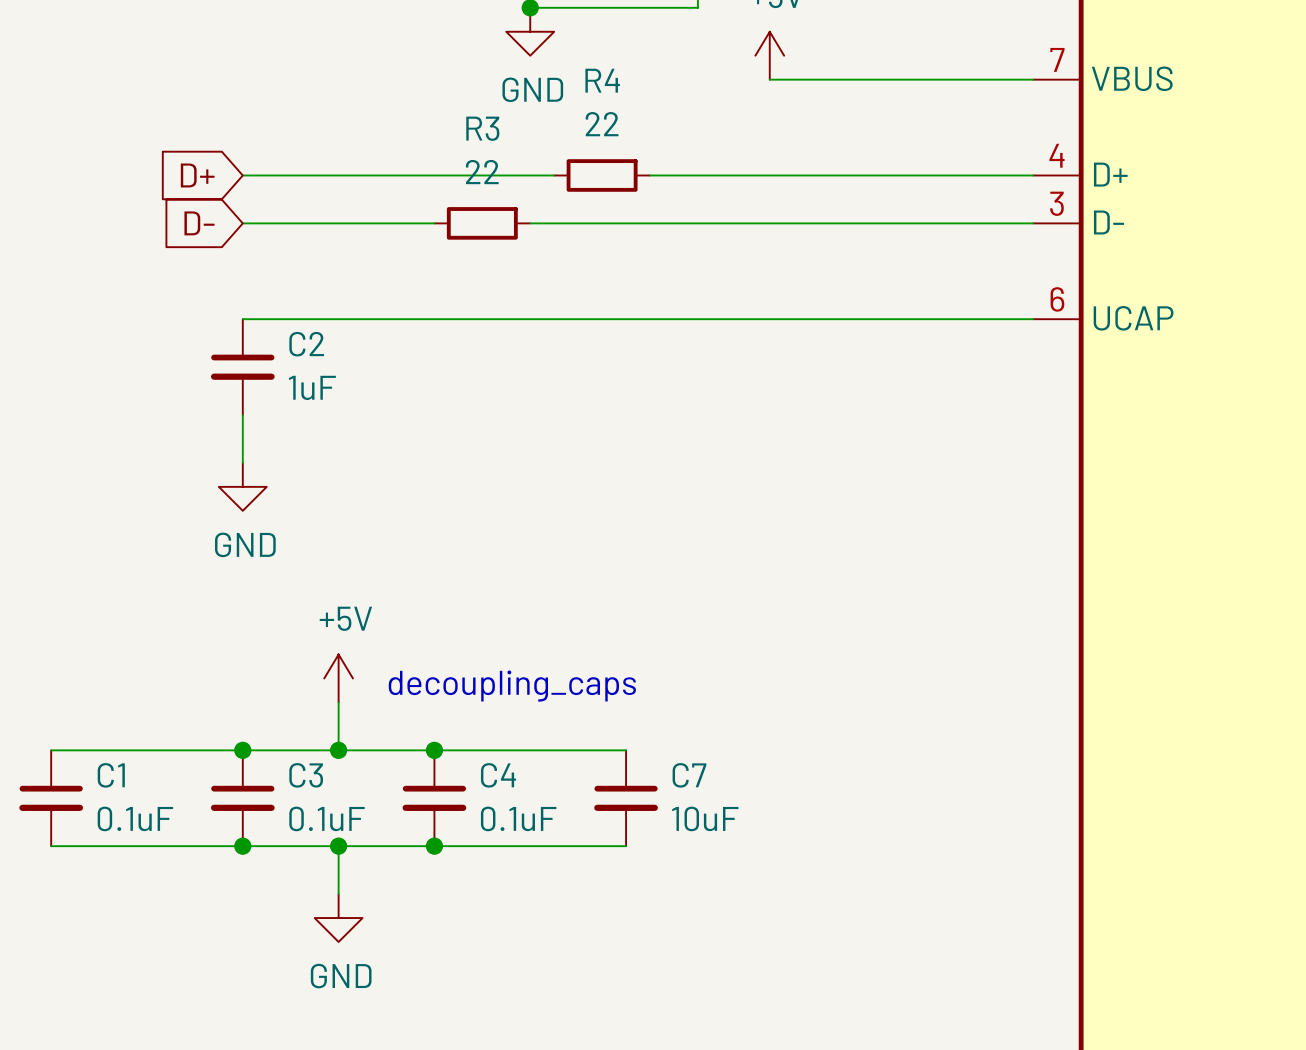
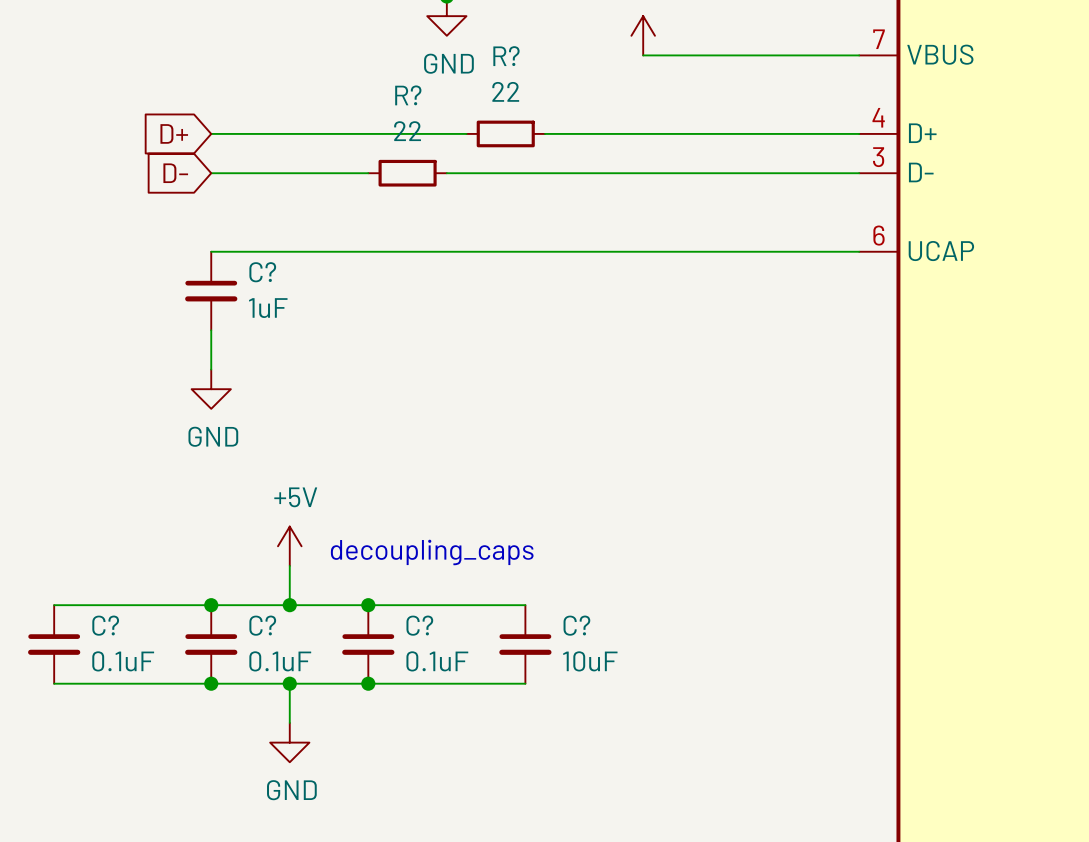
R4 name: R4 (602, 80) -> R? (506, 56)
R3 name: R3 (482, 128) -> R? (408, 95)
C2 name: C2 (306, 344) -> C? (262, 272)
C1 name: C1 (111, 775) -> C? (105, 625)
C3 name: C3 (306, 775) -> C? (262, 625)
C4 name: C4 (498, 775) -> C? (419, 625)
C7 name: C7 (689, 775) -> C? (576, 625)

